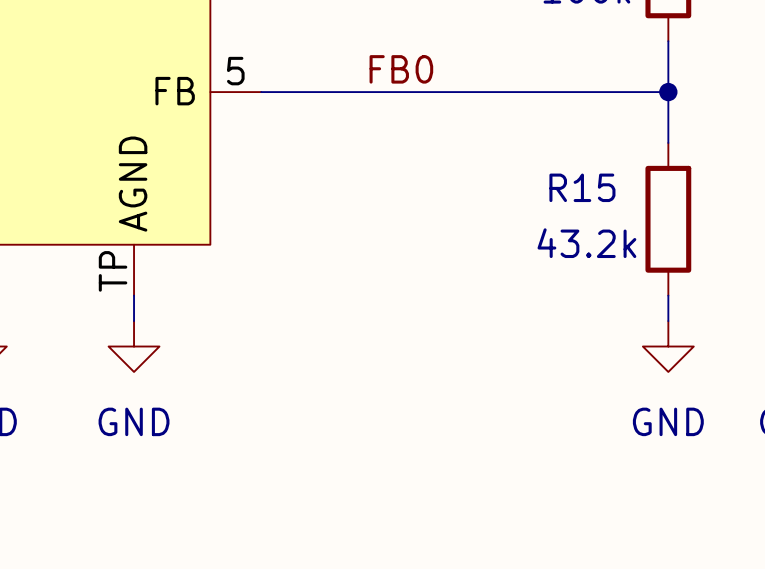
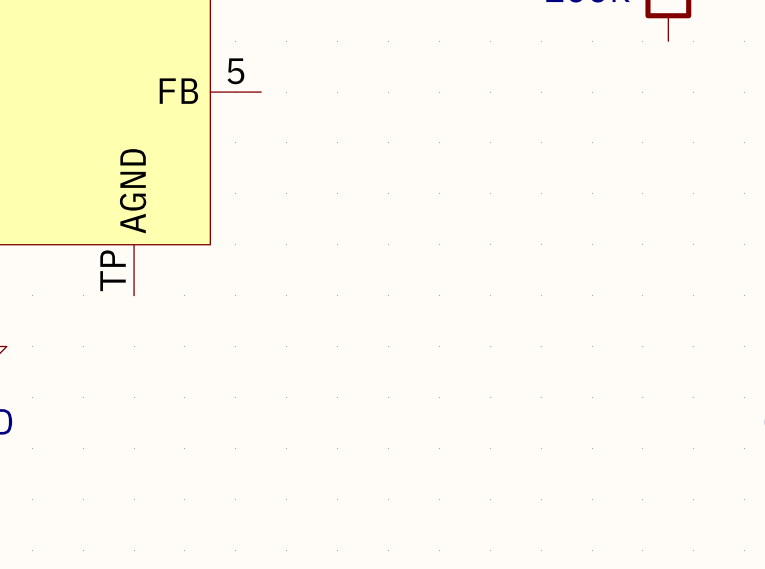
wire: (668, 41) (668, 142) -> none
label: FB0 (401, 69) -> none
wire: (261, 92) (668, 92) -> none
junction: (668, 92) -> none
R15: 43.2k (668, 219) -> none
wire: (134, 295) (134, 321) -> none
wire: (668, 295) (668, 321) -> none
power symbol: GND (134, 346) -> none
power symbol: GND (668, 346) -> none

